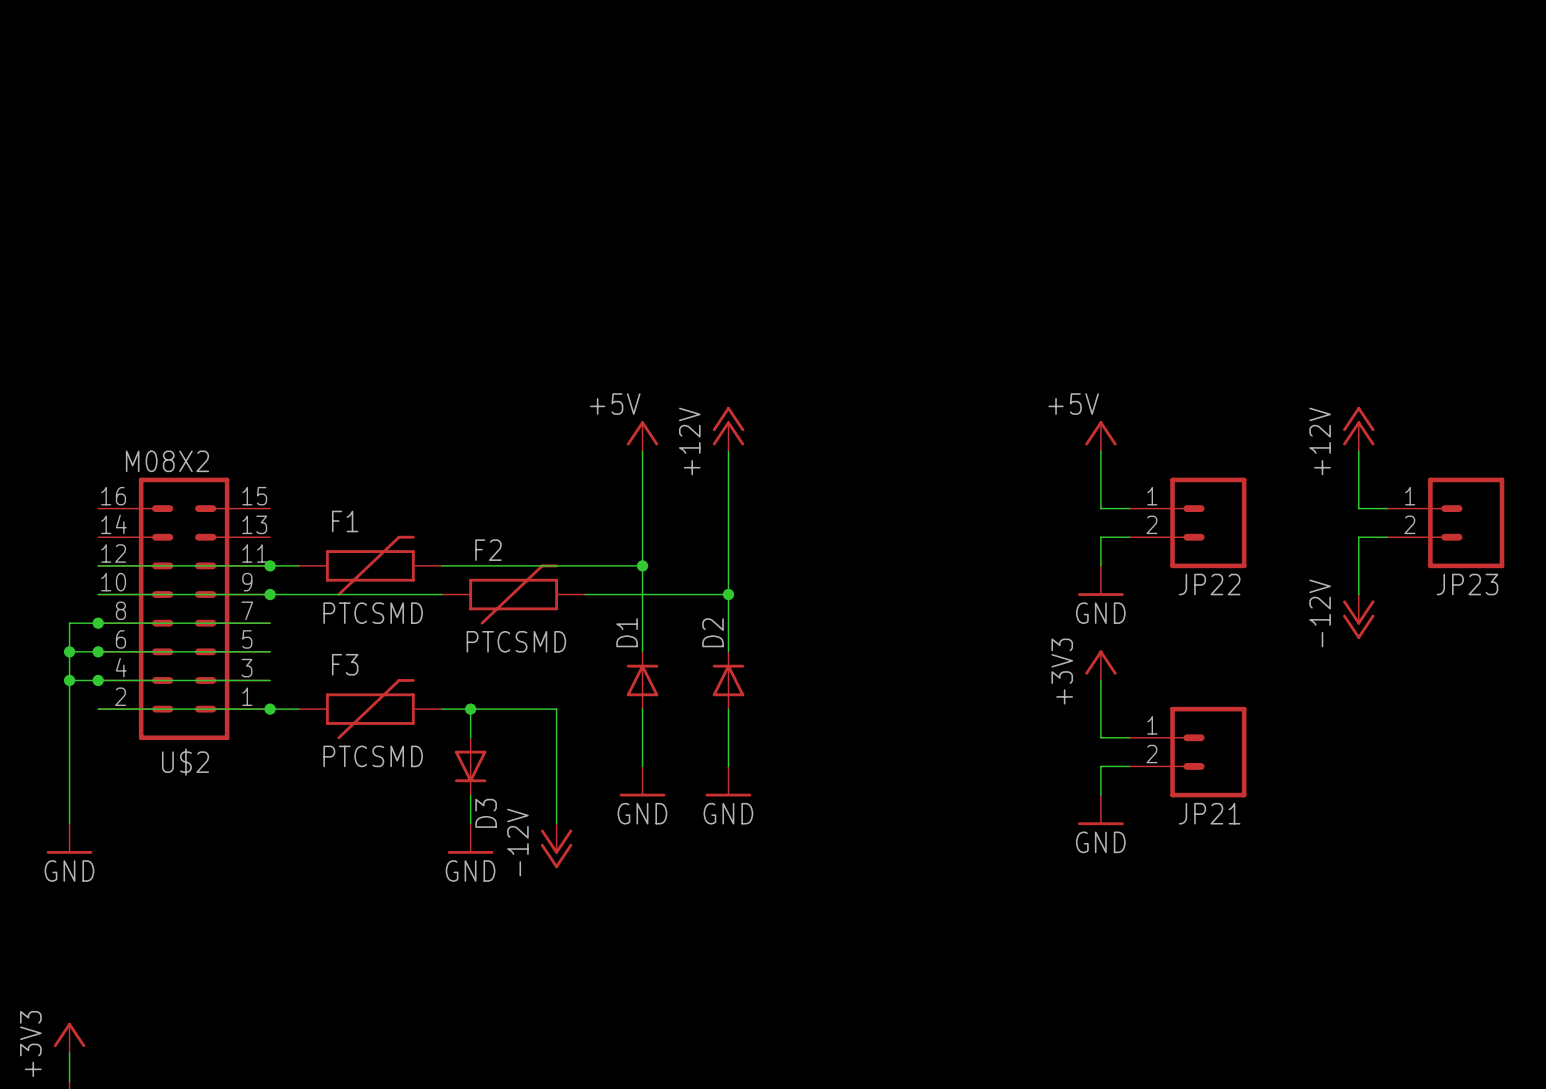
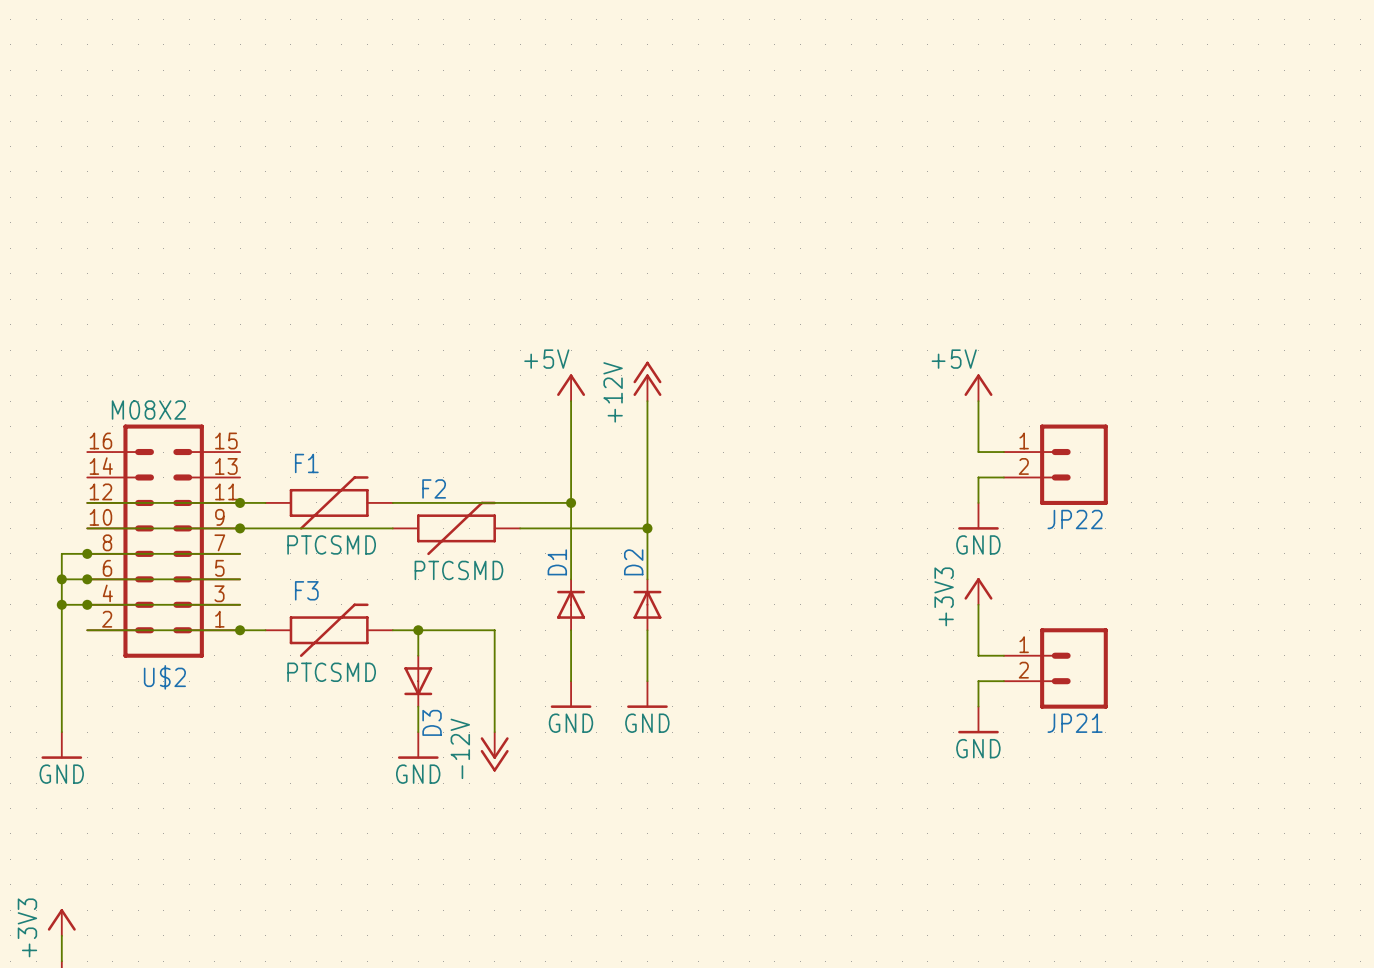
power symbol: +12V (1358, 429) -> none
wire: (1358, 451) (1358, 508) (1387, 508) -> none
JP23: (1445, 522) -> none
wire: (1387, 537) (1358, 537) (1358, 594) -> none
power symbol: -12V (1358, 616) -> none

